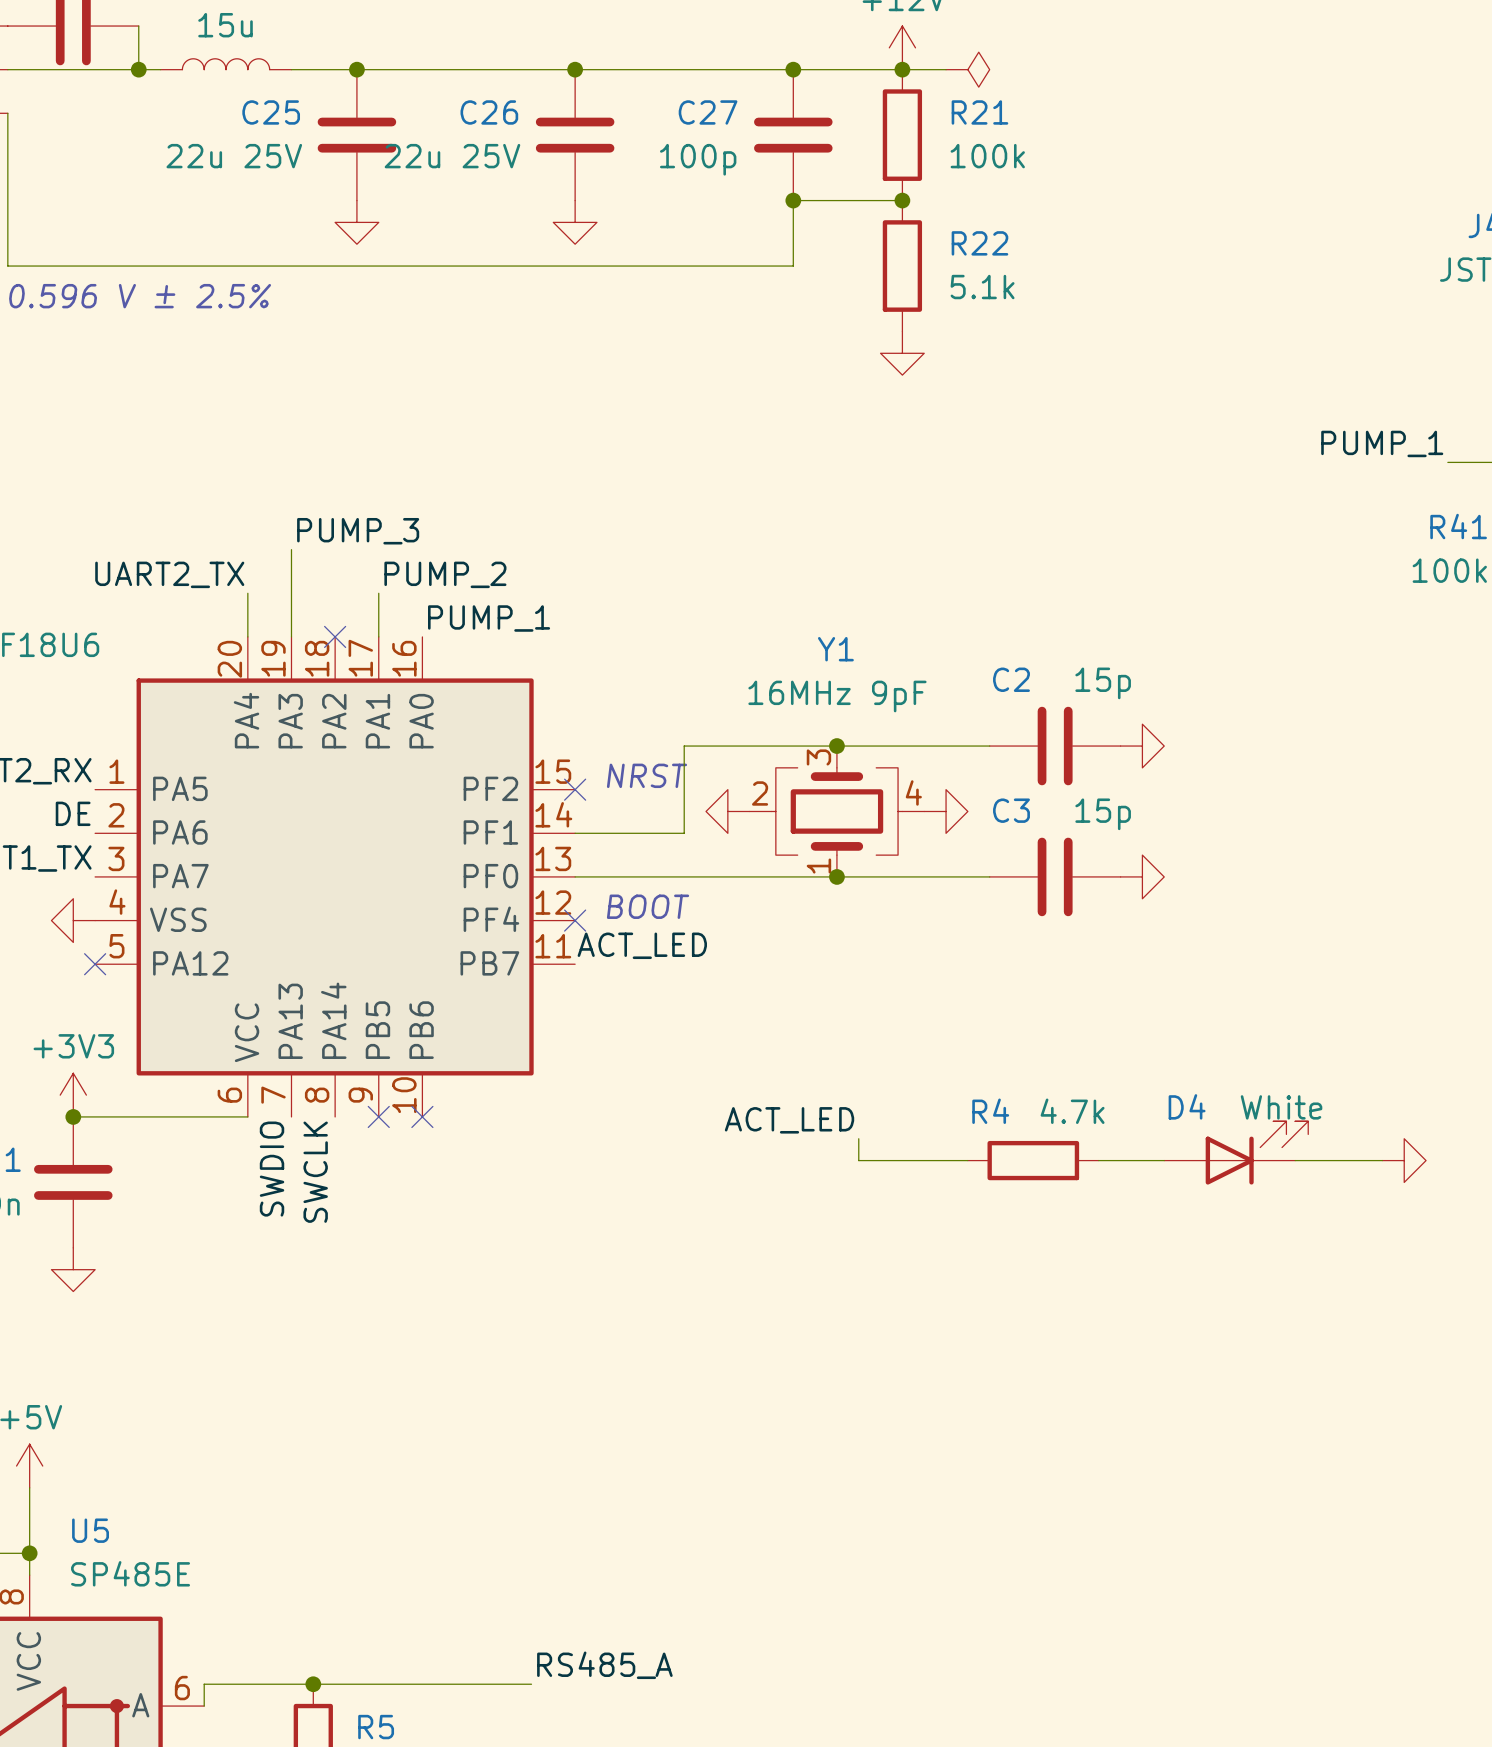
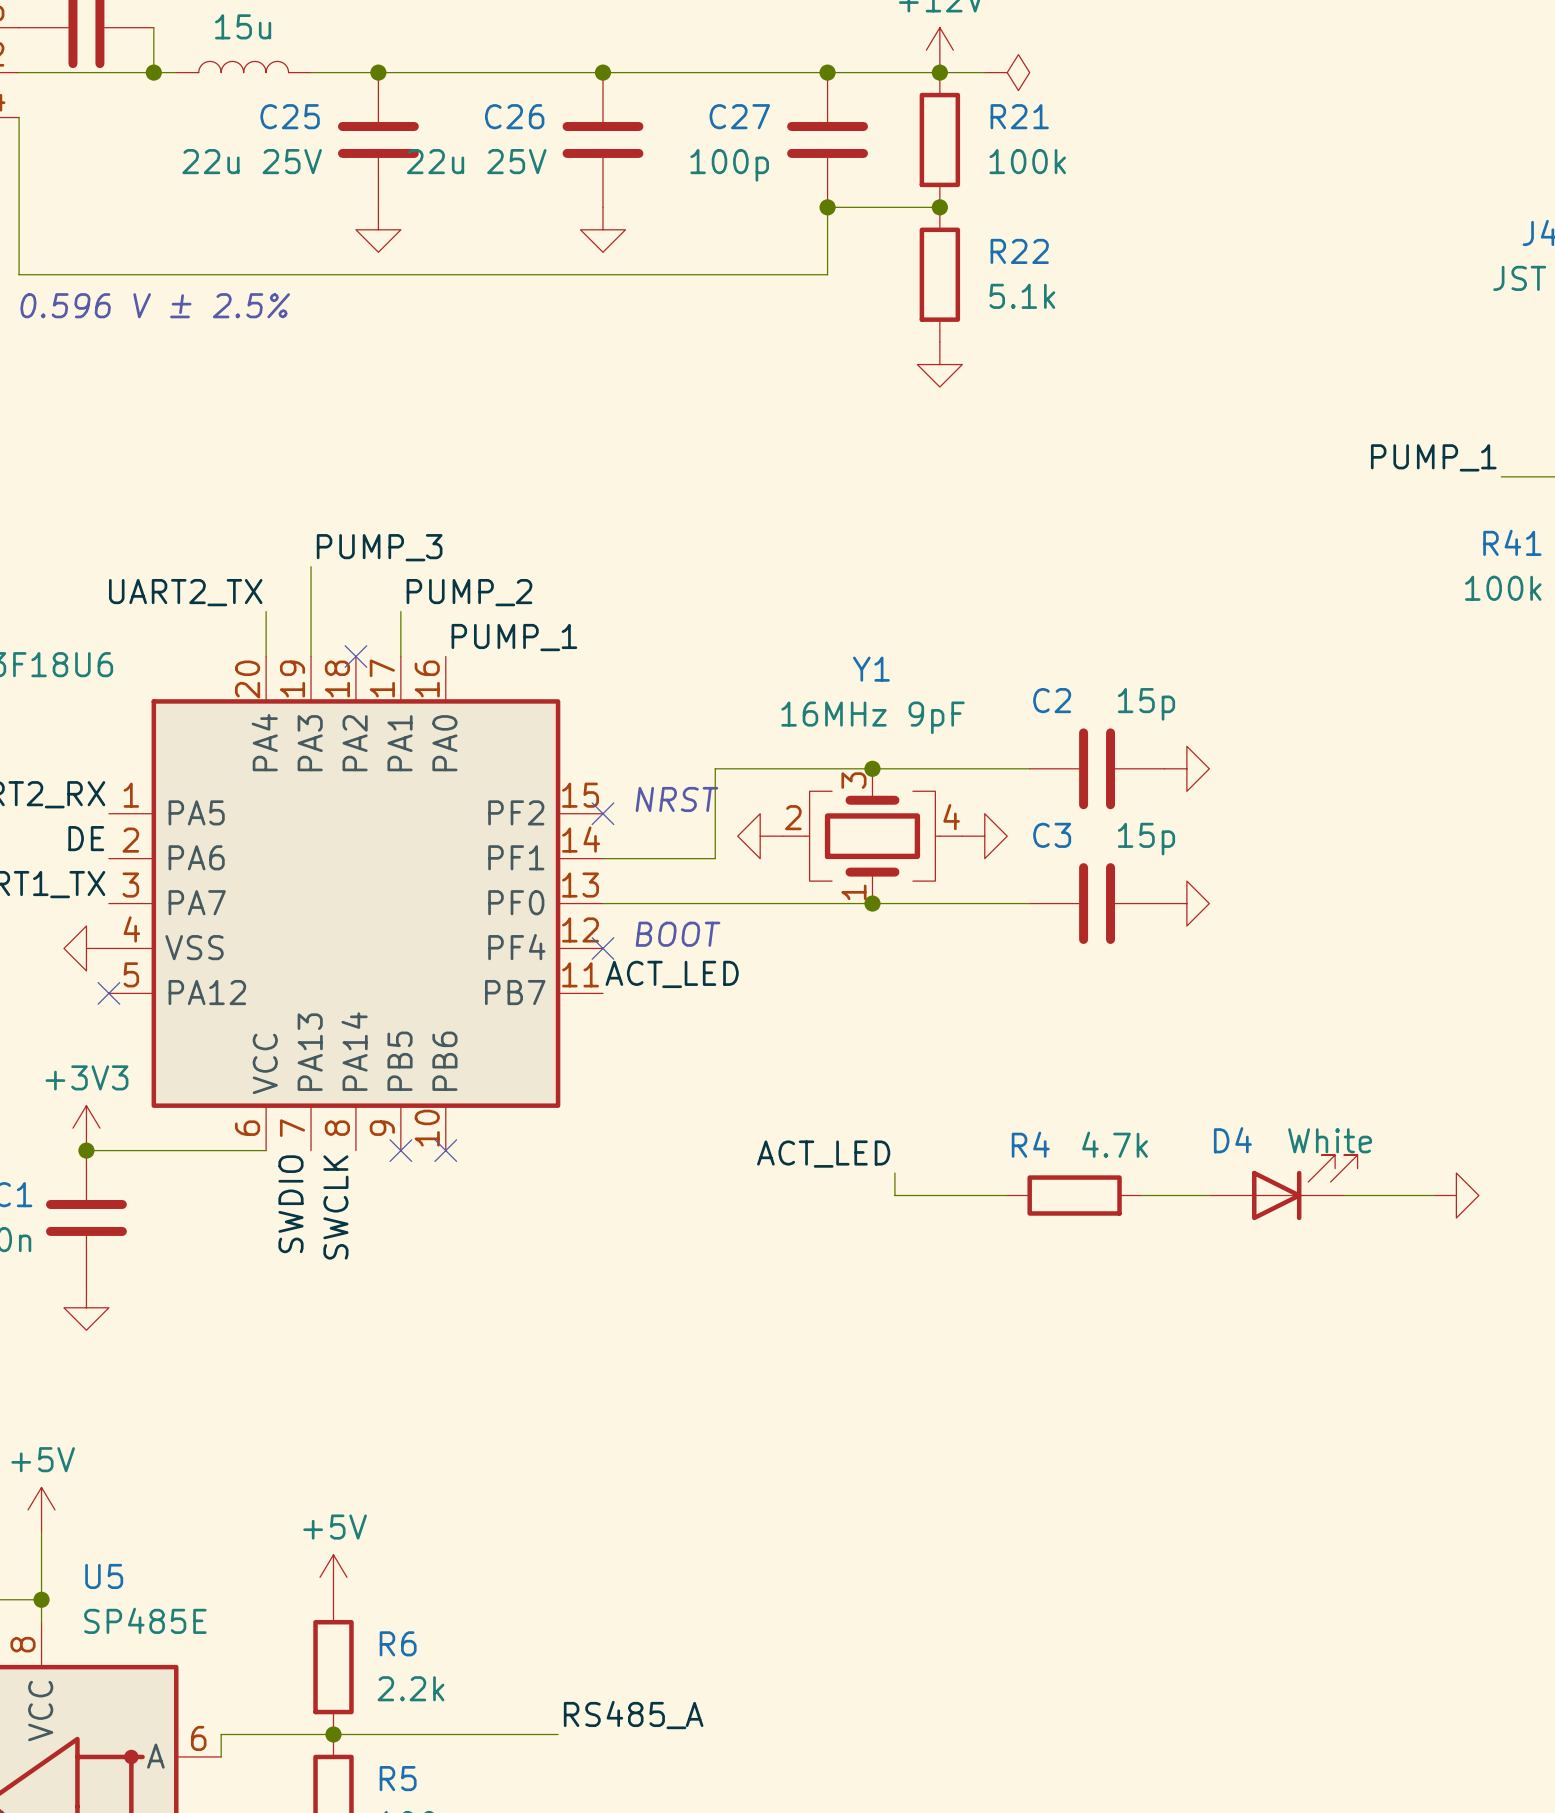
power symbol: none -> +5V (333, 1577)
R6: none -> 2.2k (333, 1667)

